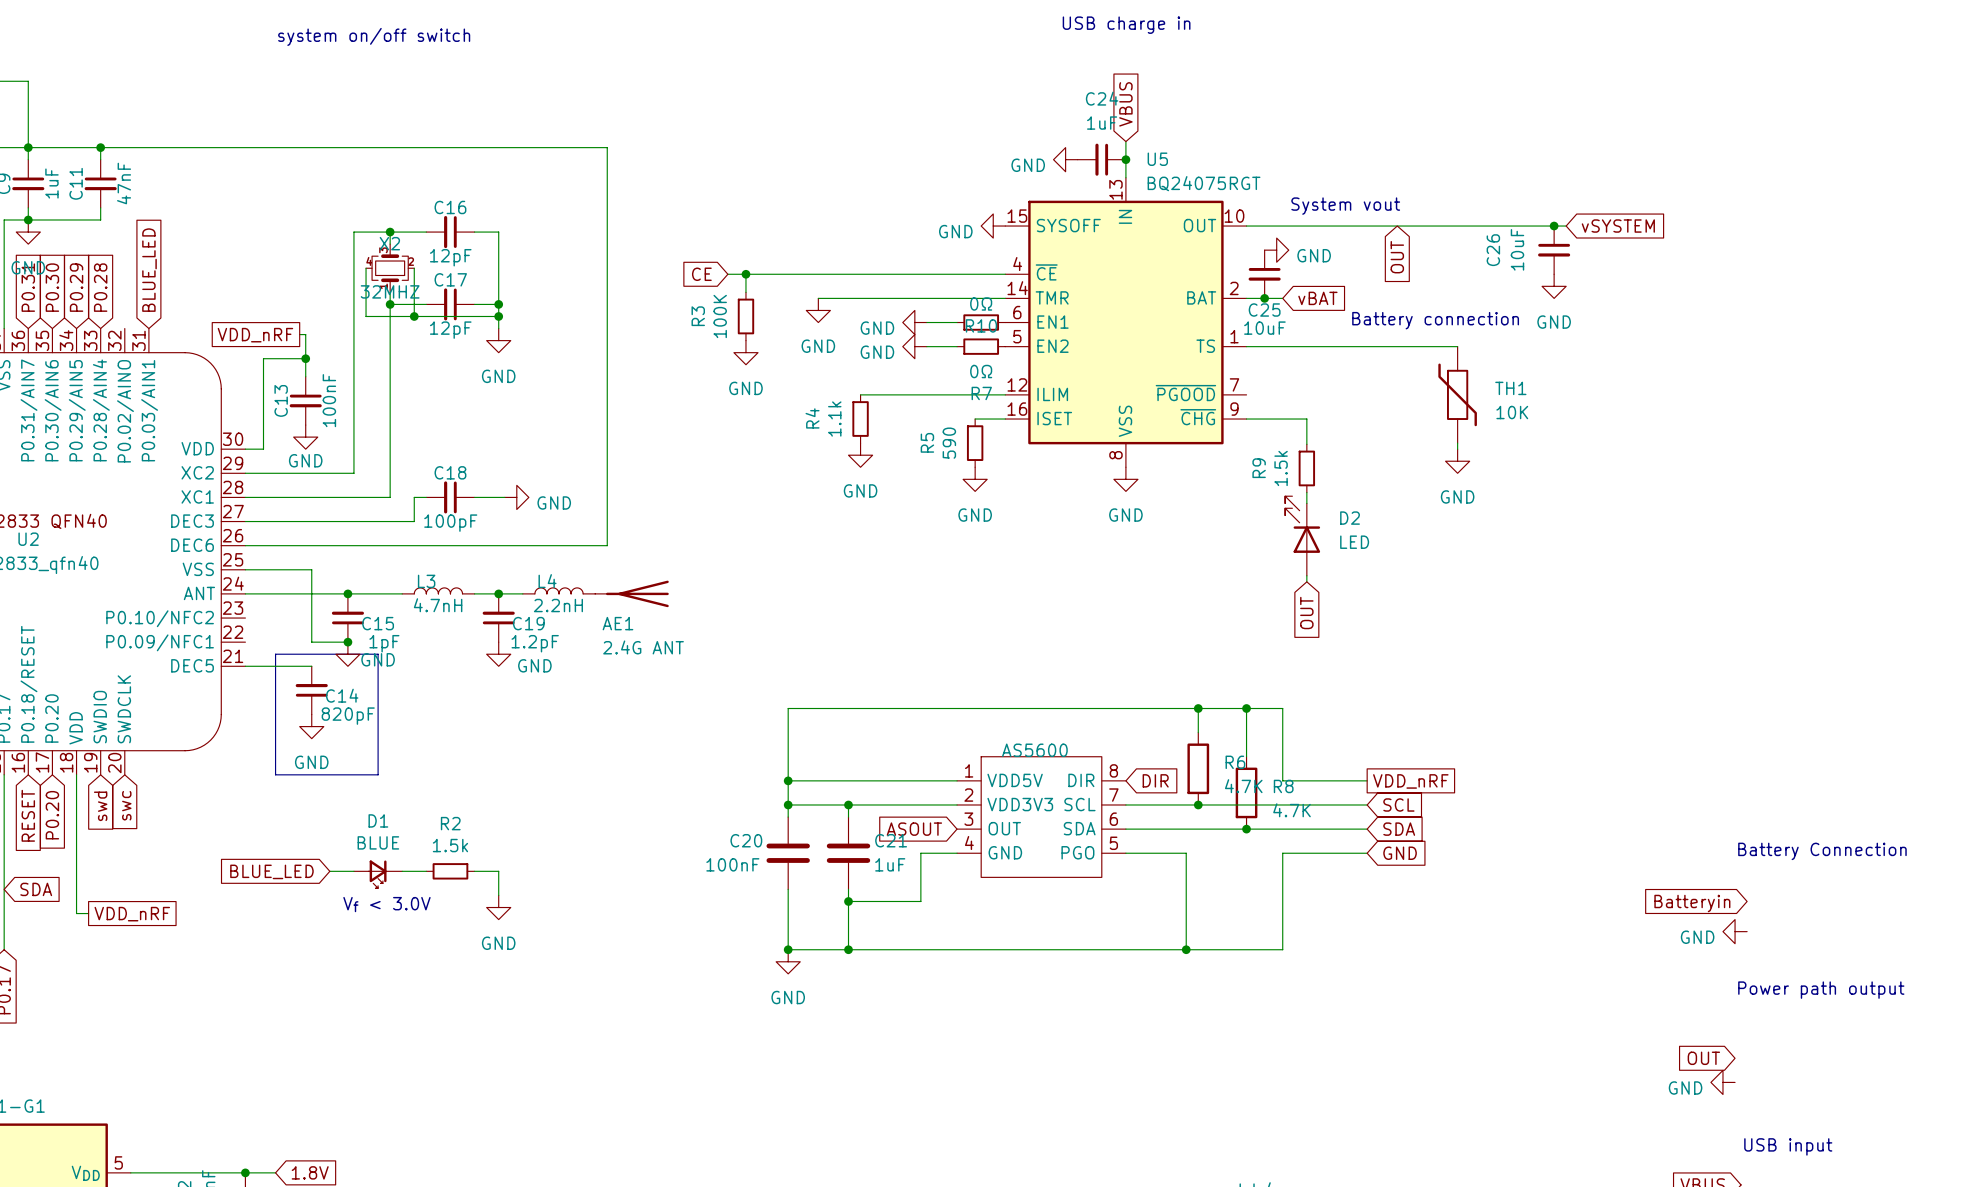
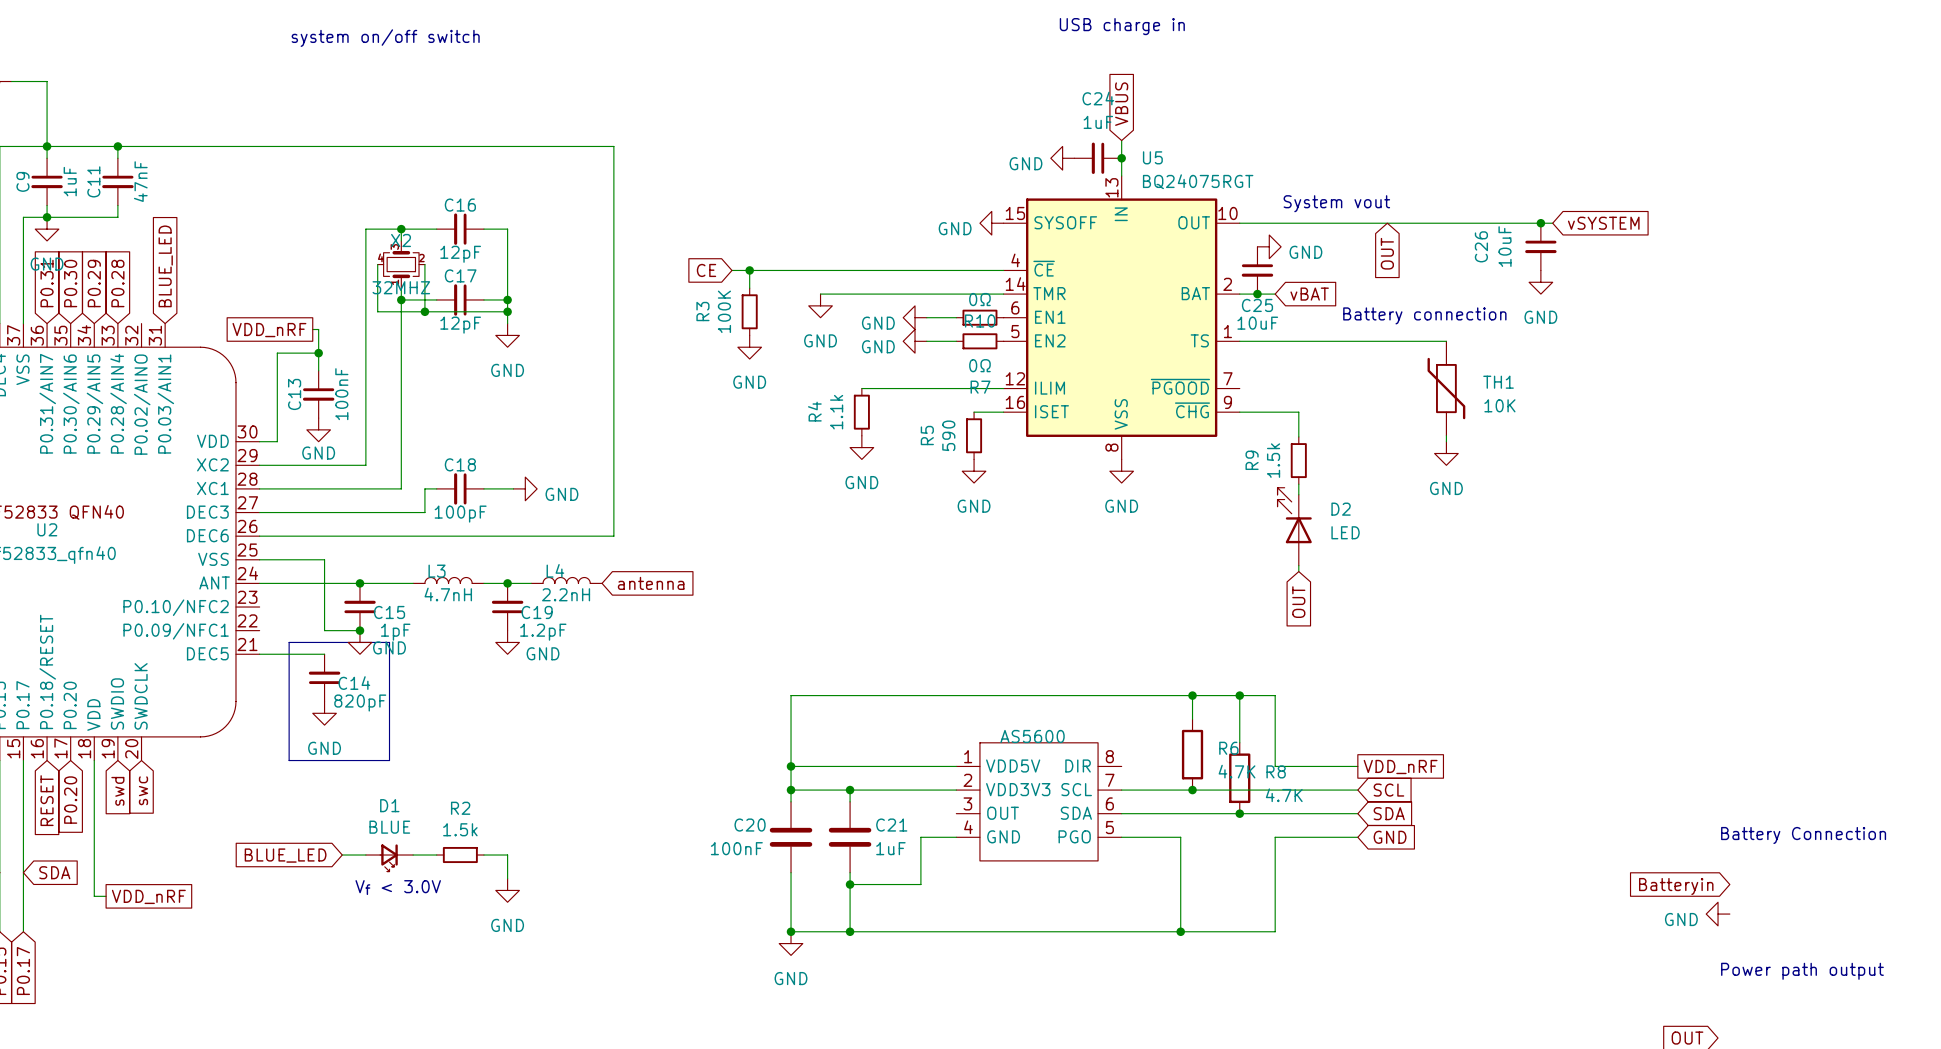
AE1: 2.4G ANT (631, 593) -> none
global label: none -> antenna (651, 583)
global label: DIR (1155, 780) -> none
global label: ASOUT (914, 829) -> none

